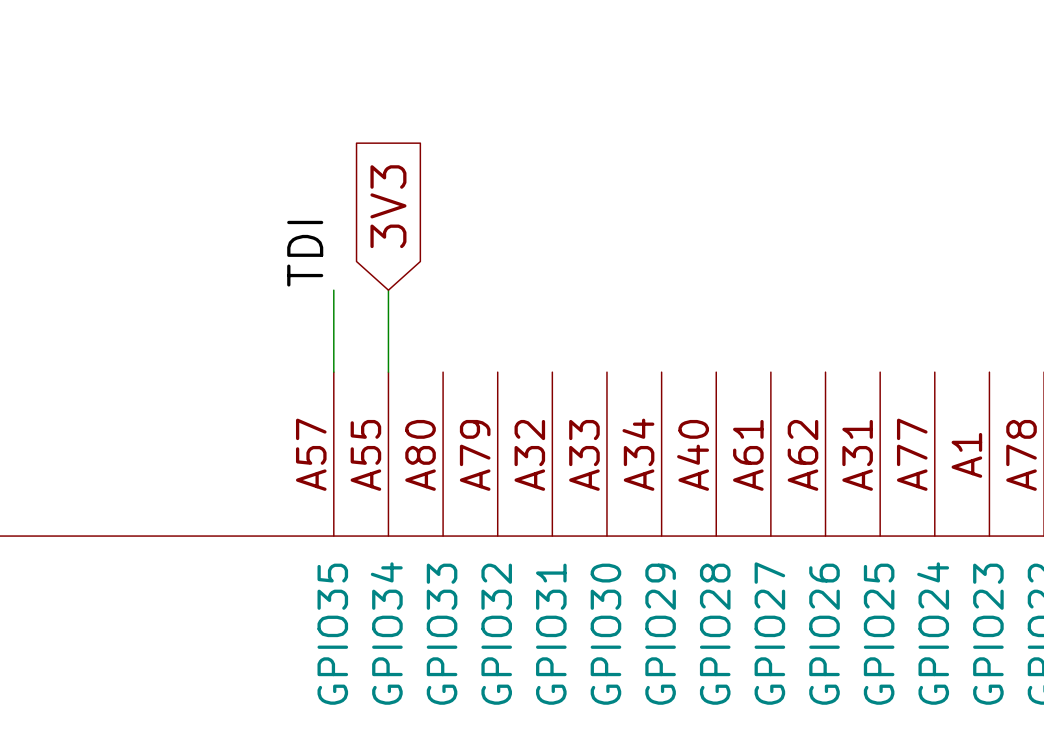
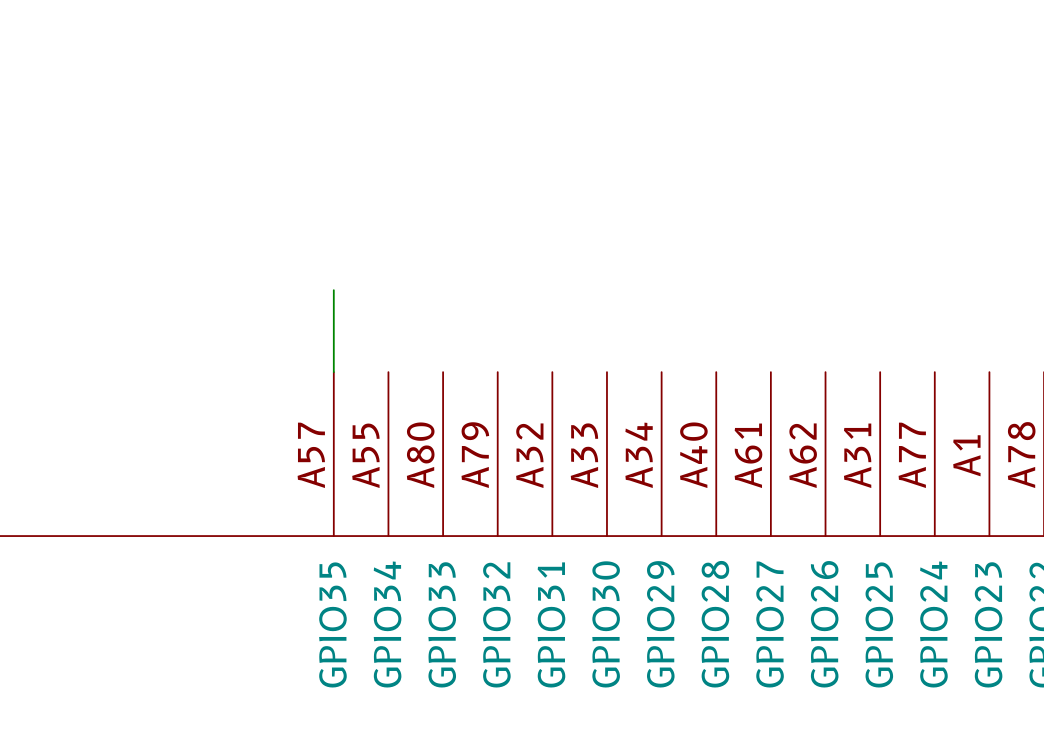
global label: 3V3 (388, 206) -> none
label: TDI (305, 253) -> none
wire: (388, 290) (388, 372) -> none

